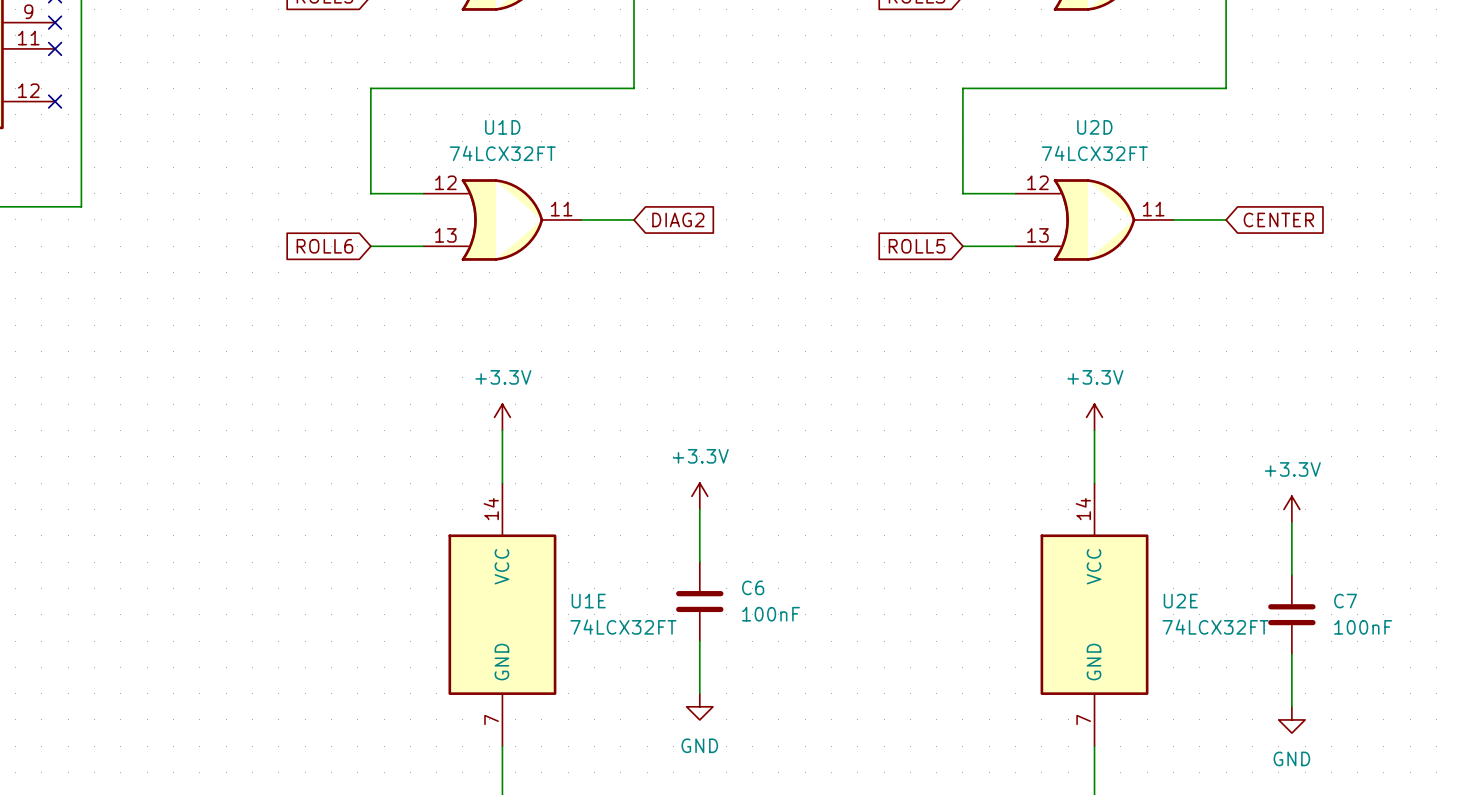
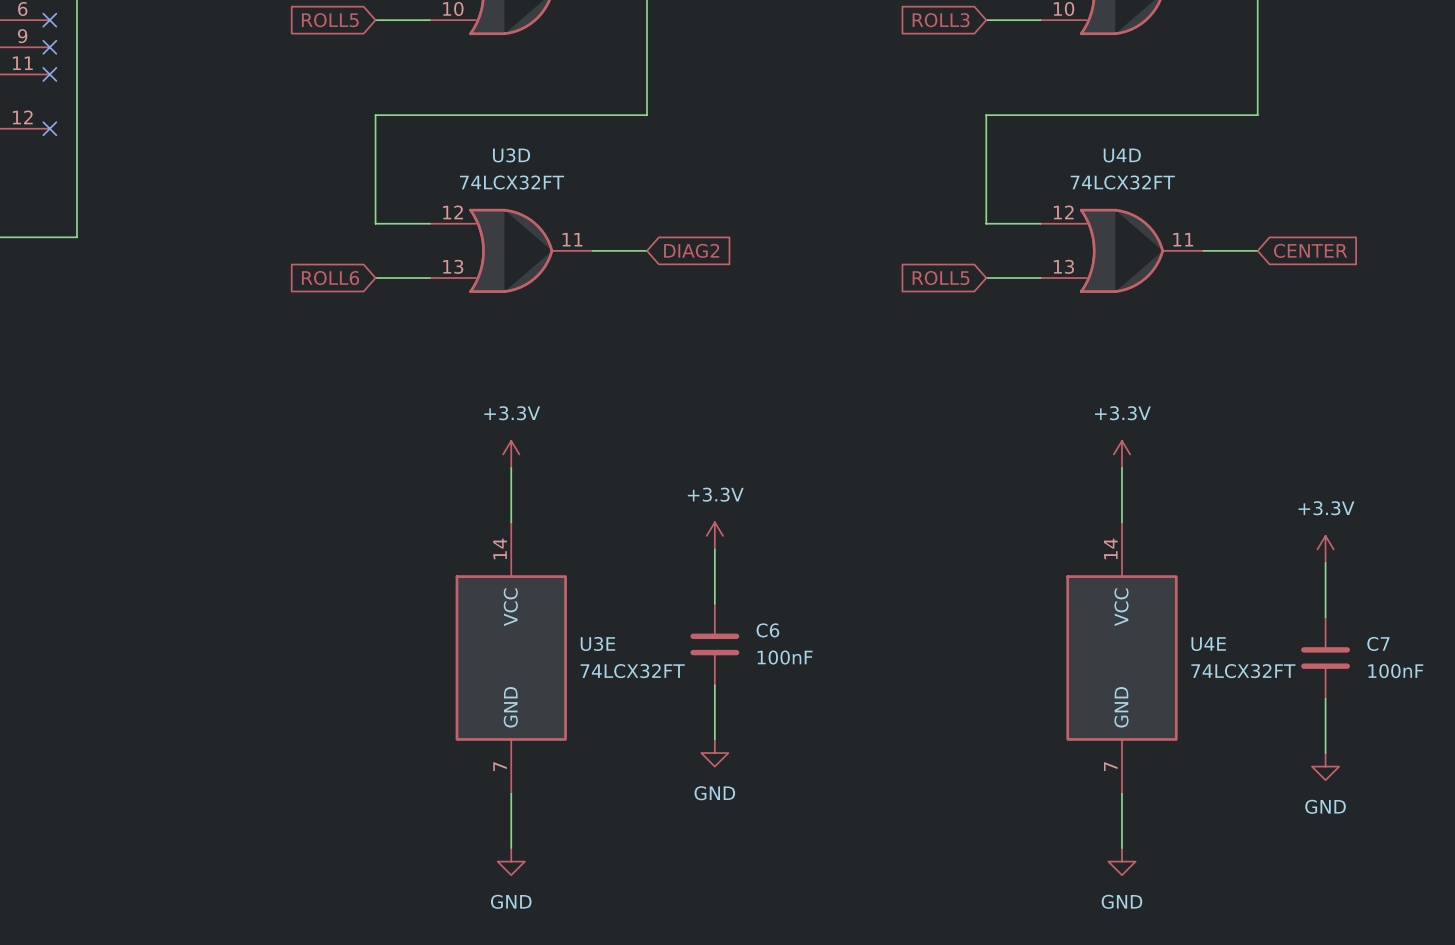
U1D name: U1D (502, 127) -> U3D (511, 155)
U2D name: U2D (1094, 127) -> U4D (1122, 155)
U1E name: U1E (588, 601) -> U3E (597, 643)
U2E name: U2E (1180, 601) -> U4E (1208, 644)

